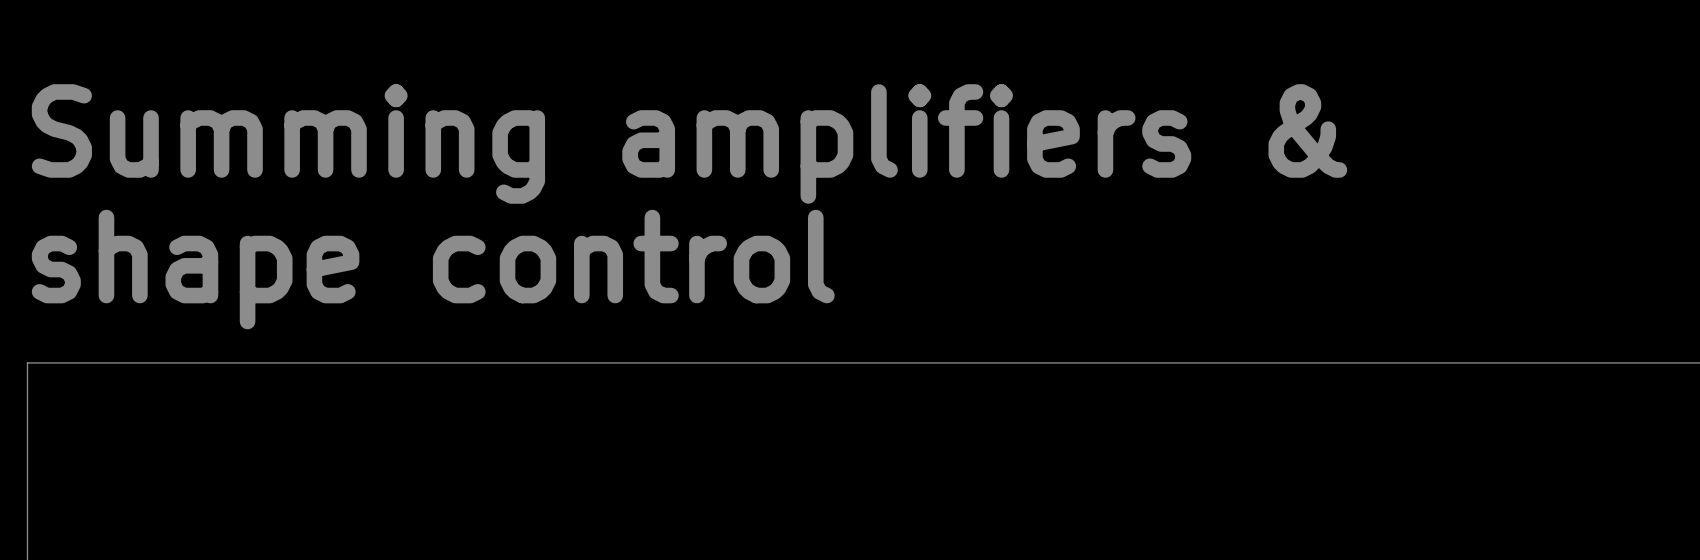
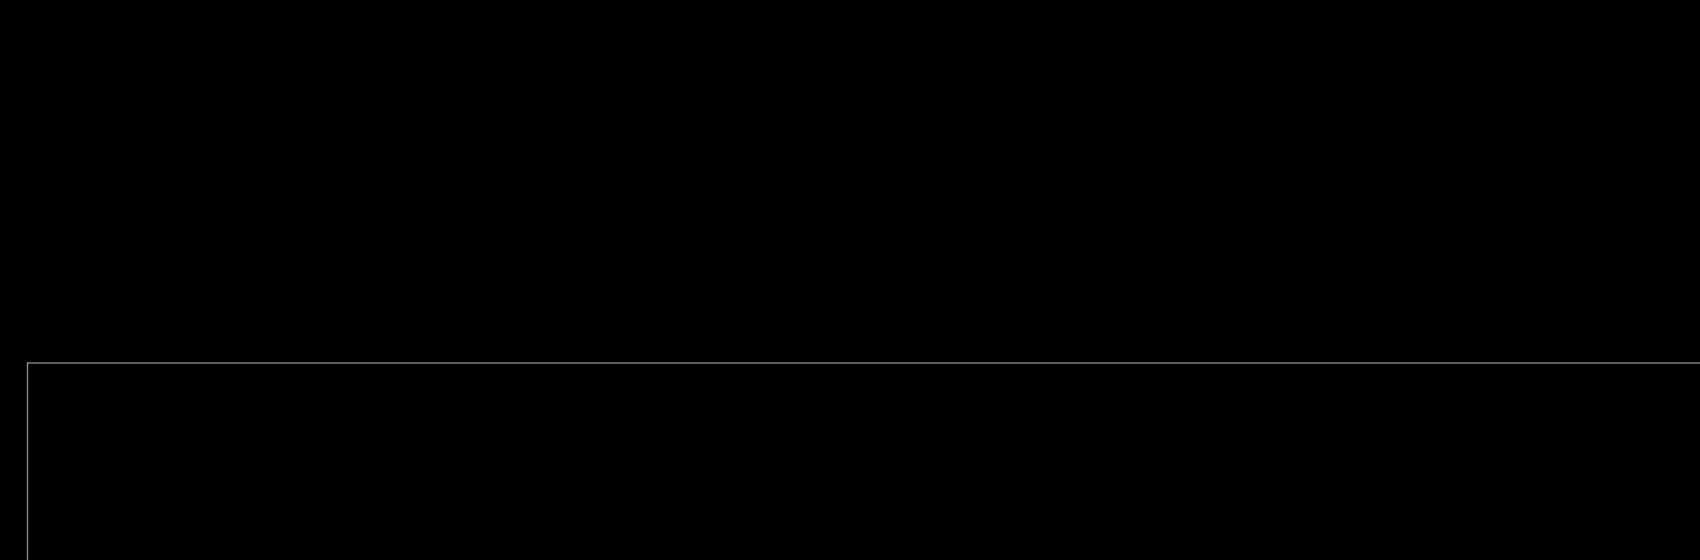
text: Summing amplifiers & (689, 143) -> none
text: shape control (433, 269) -> none

